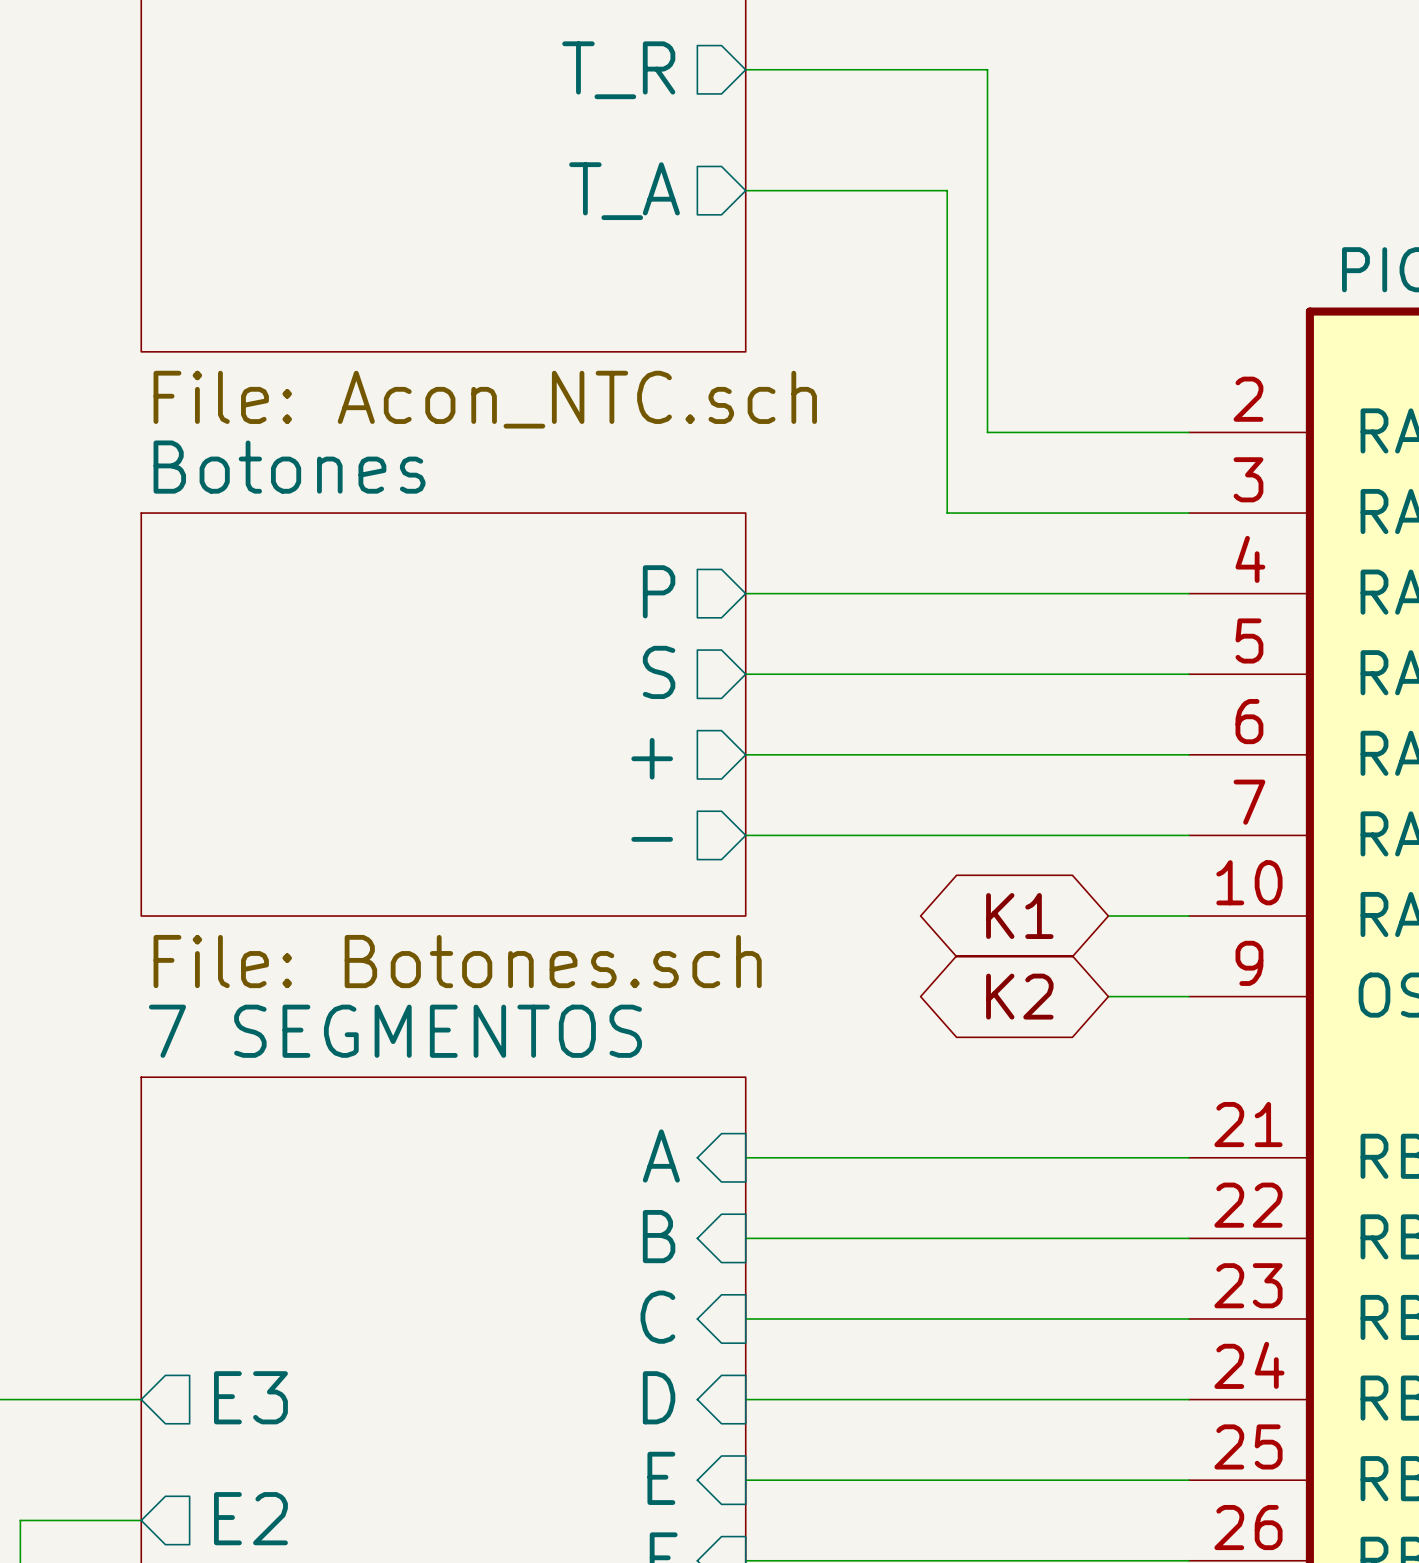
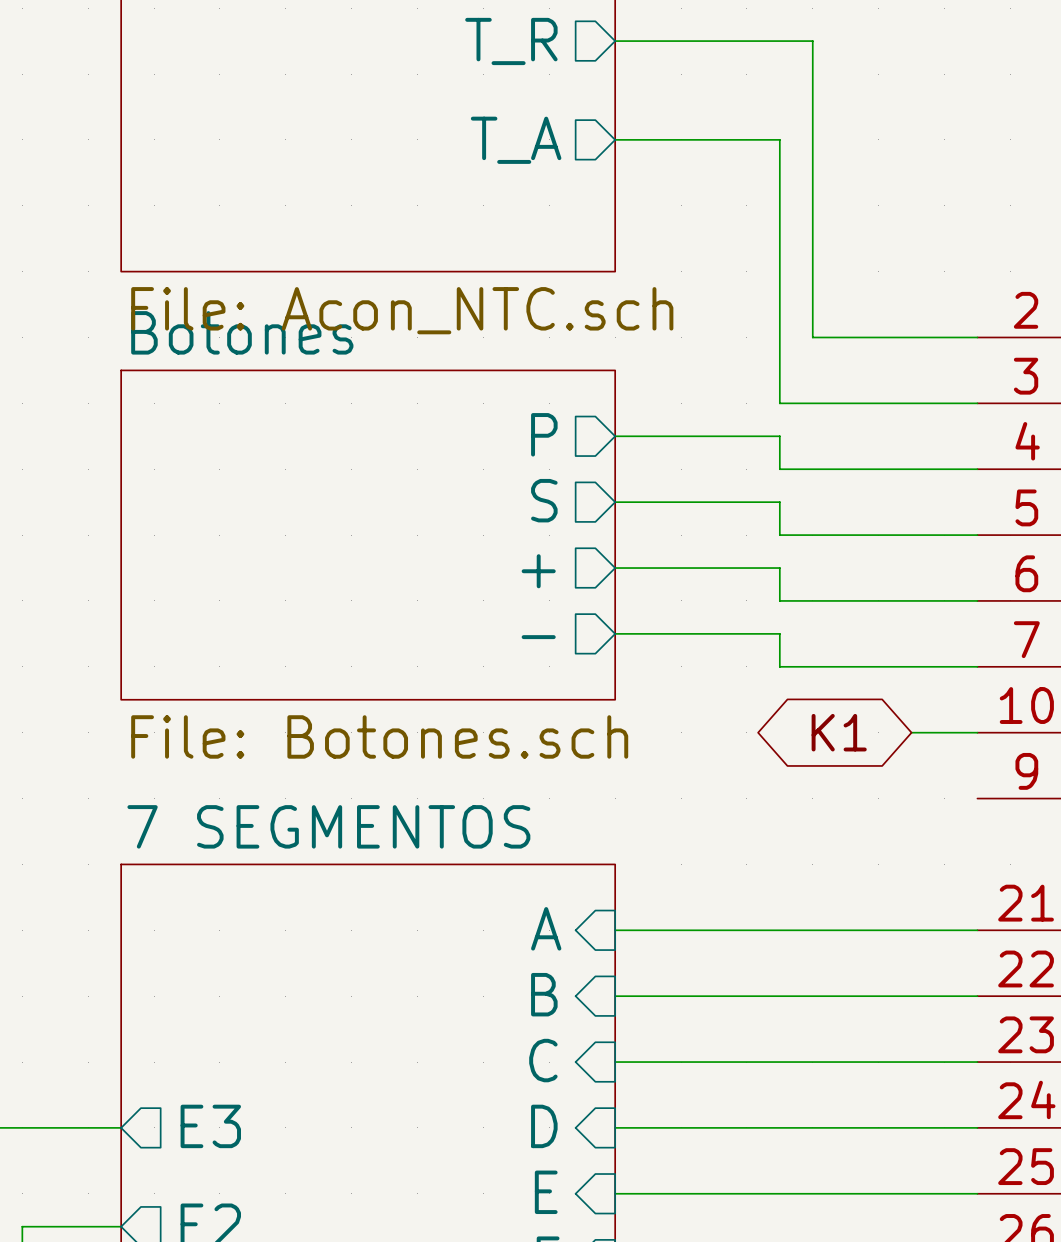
sheet pin position: P (659, 591) -> P (544, 434)
wire: (745, 593) (947, 593) -> (615, 436) (779, 436) (779, 469)
sheet pin position: S (659, 672) -> S (544, 500)
wire: (745, 674) (947, 674) -> (615, 502) (779, 502) (779, 535)
sheet Botones position: (443, 714) -> (368, 535)
wire: (745, 754) (947, 754) -> (615, 568) (779, 568) (779, 600)
sheet pin position: + (652, 758) -> + (538, 571)
wire: (745, 835) (947, 835) -> (615, 633) (779, 633) (779, 666)
sheet pin position: - (652, 839) -> - (538, 637)
global label: K2 (1019, 996) -> none
wire: (1108, 996) (1189, 996) -> none

